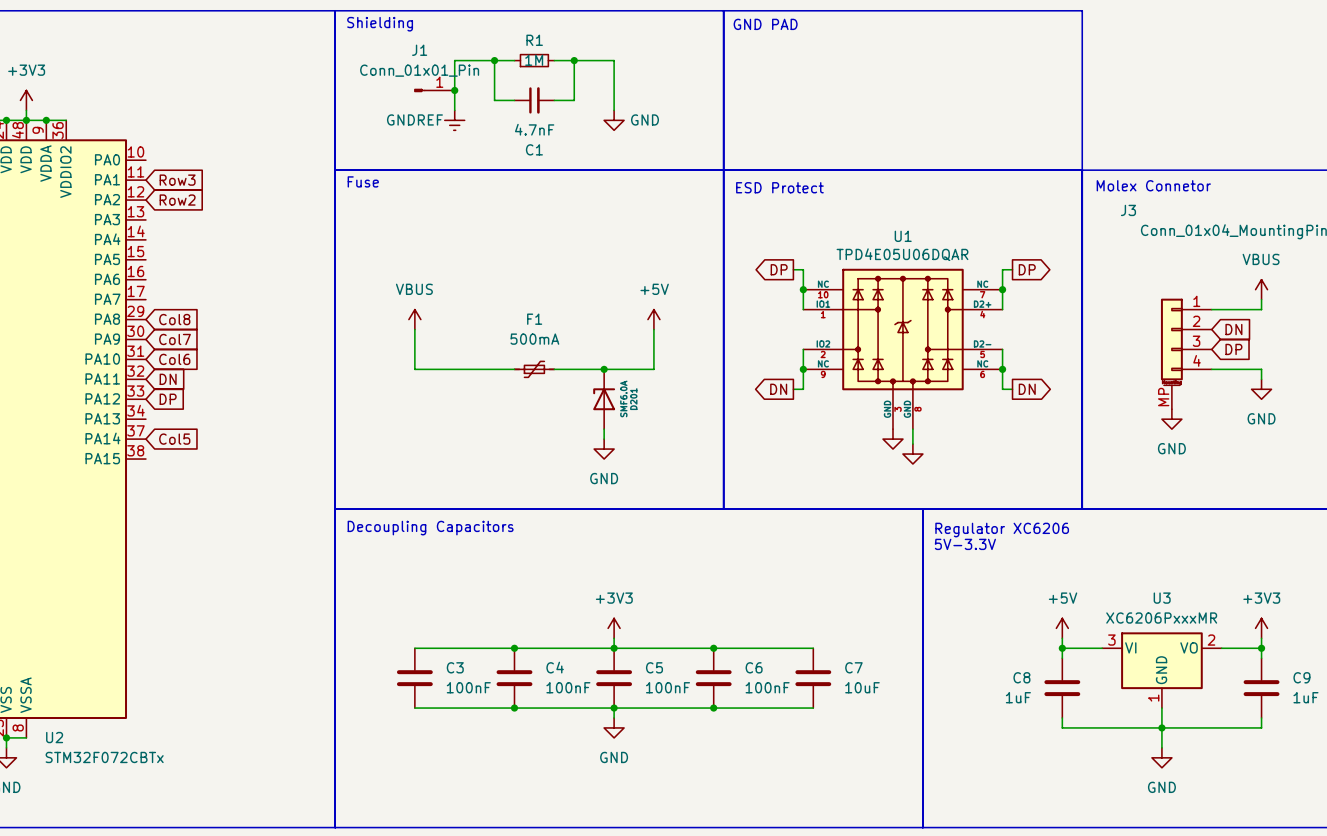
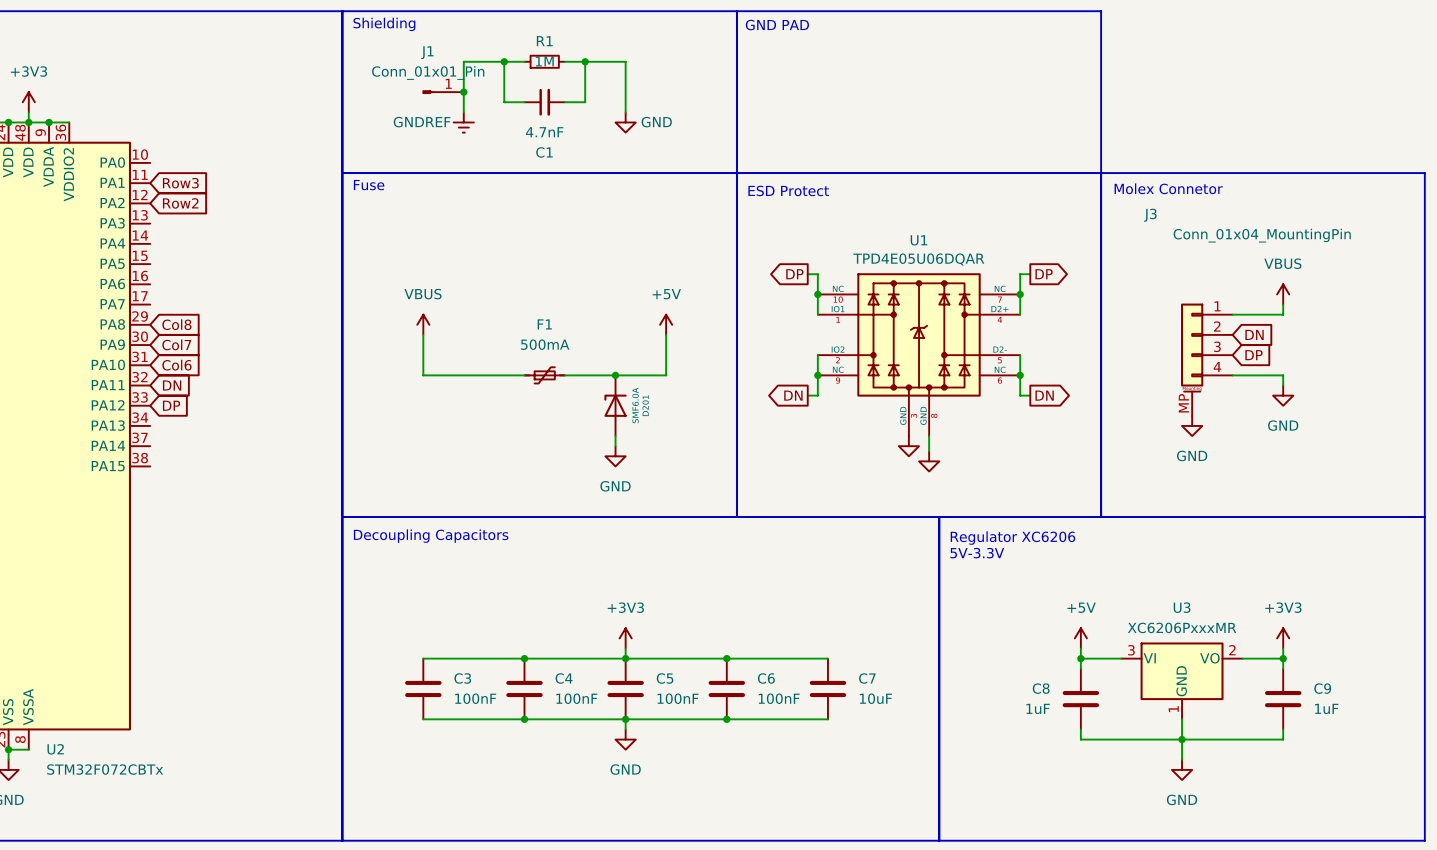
global label: Col5 (174, 439) -> none

